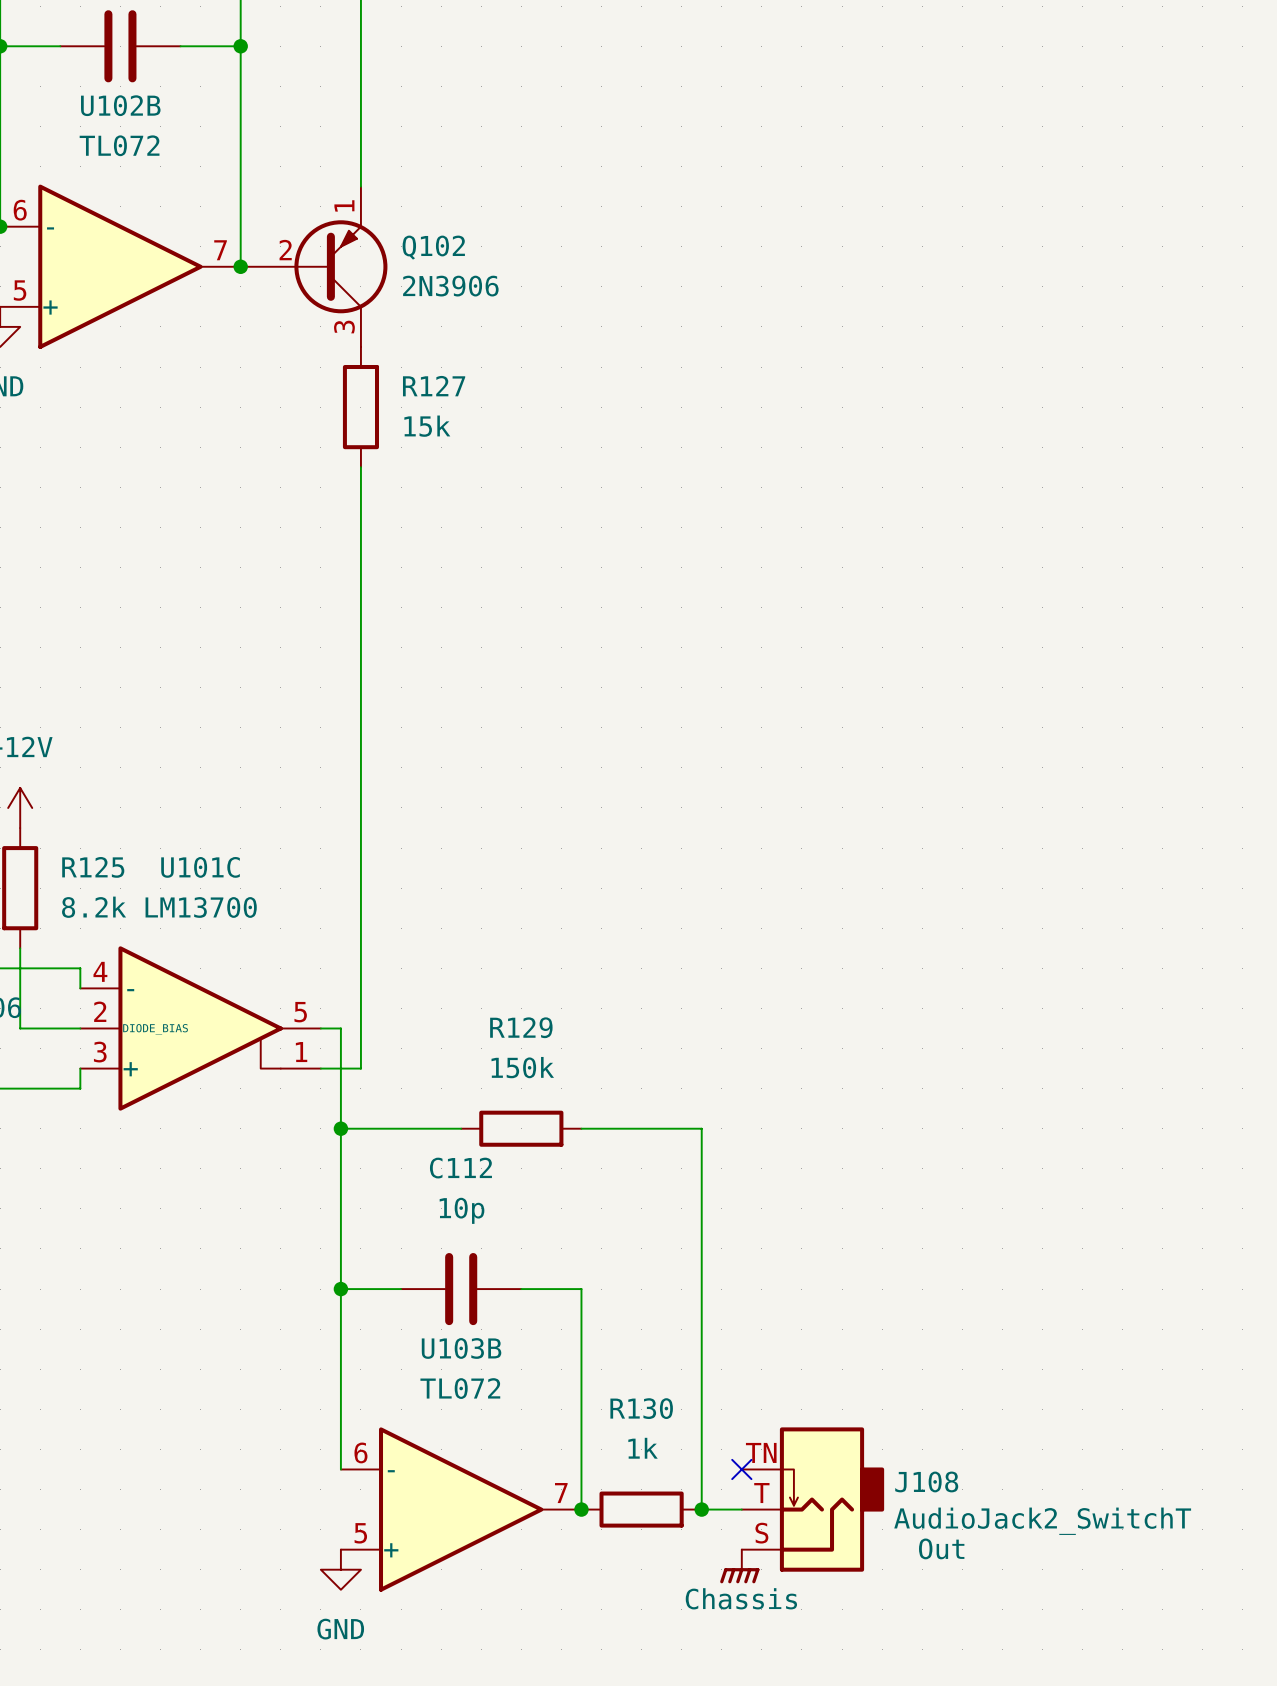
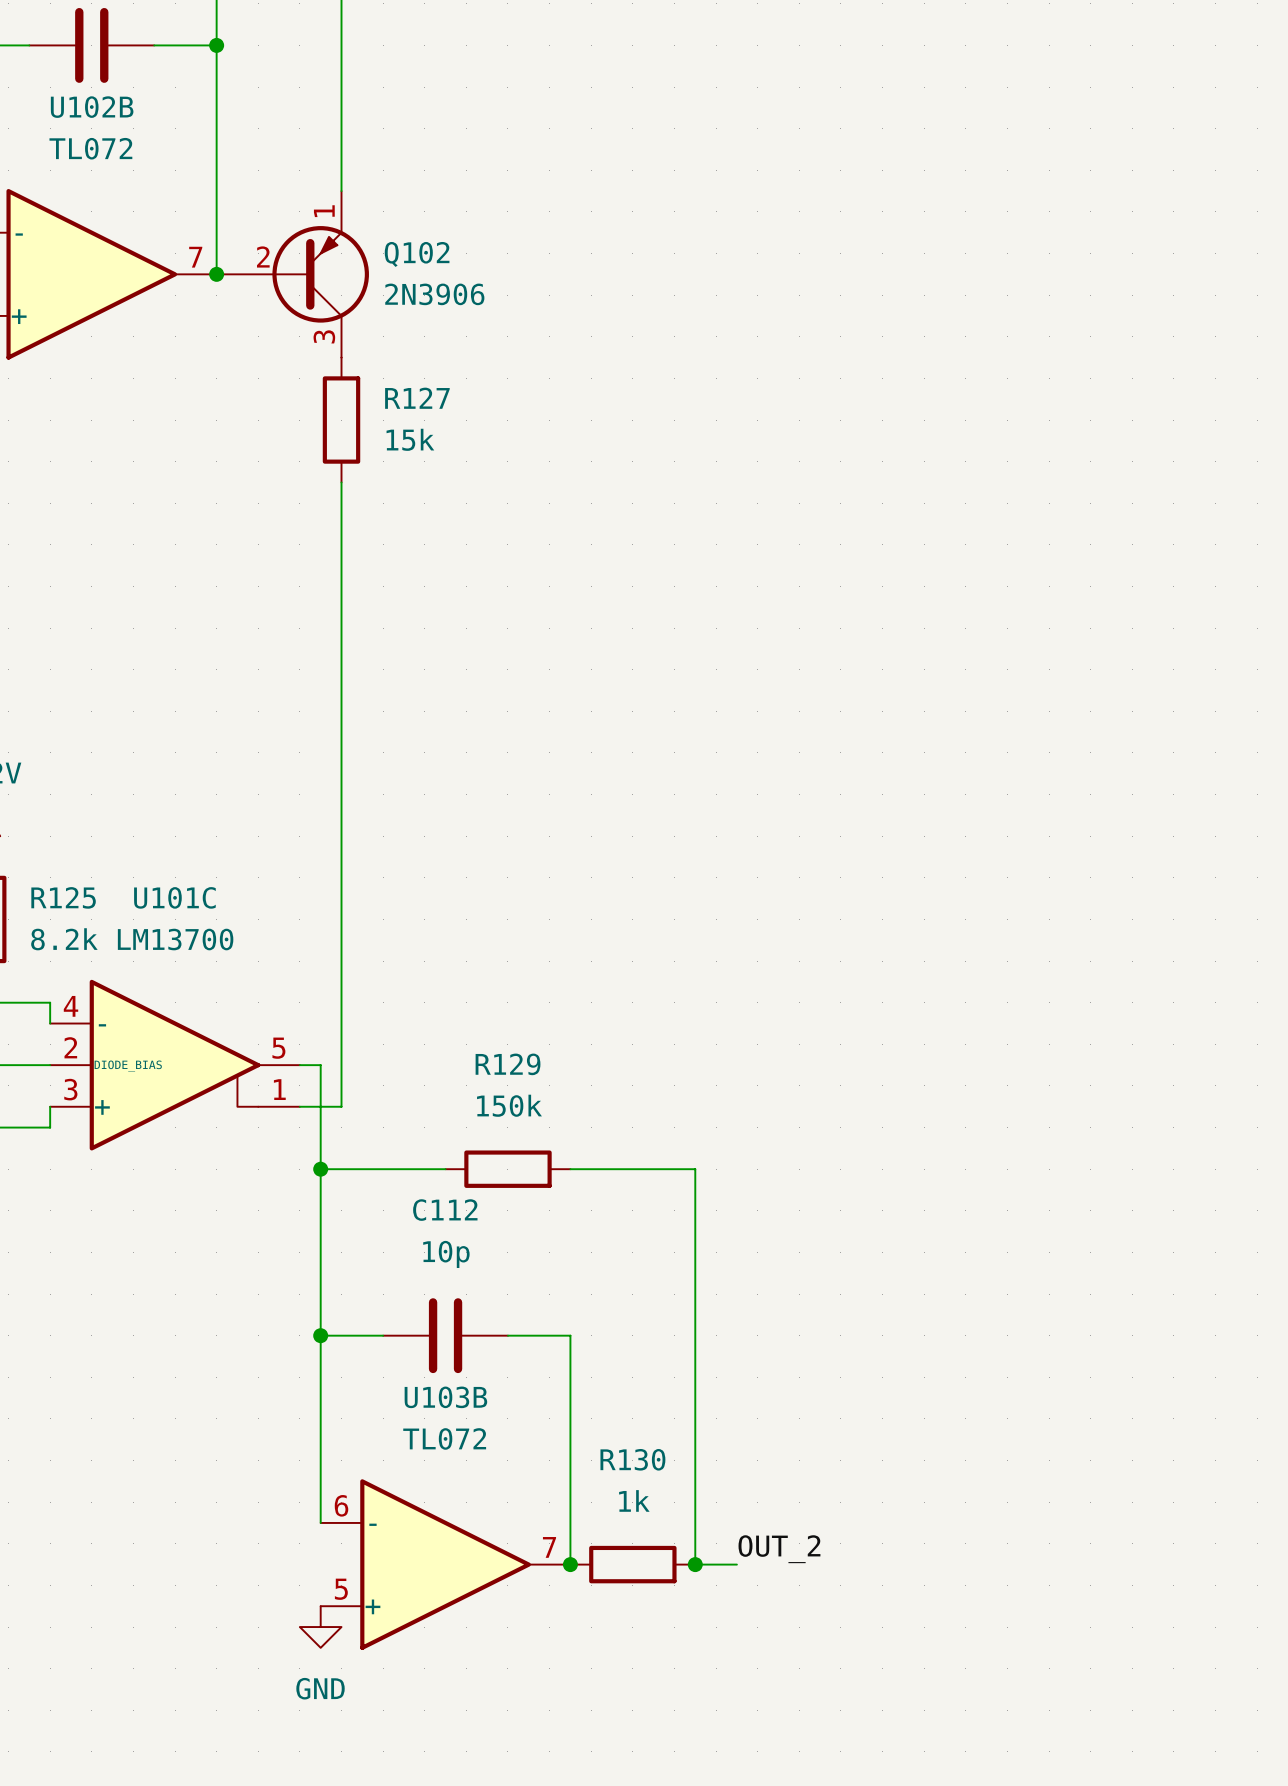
no-connect mark: (741, 1469) -> none
label: none -> OUT_2 (779, 1549)
J108: AudioJack2_SwitchT (812, 1499) -> none
power symbol: Chassis (739, 1566) -> none

